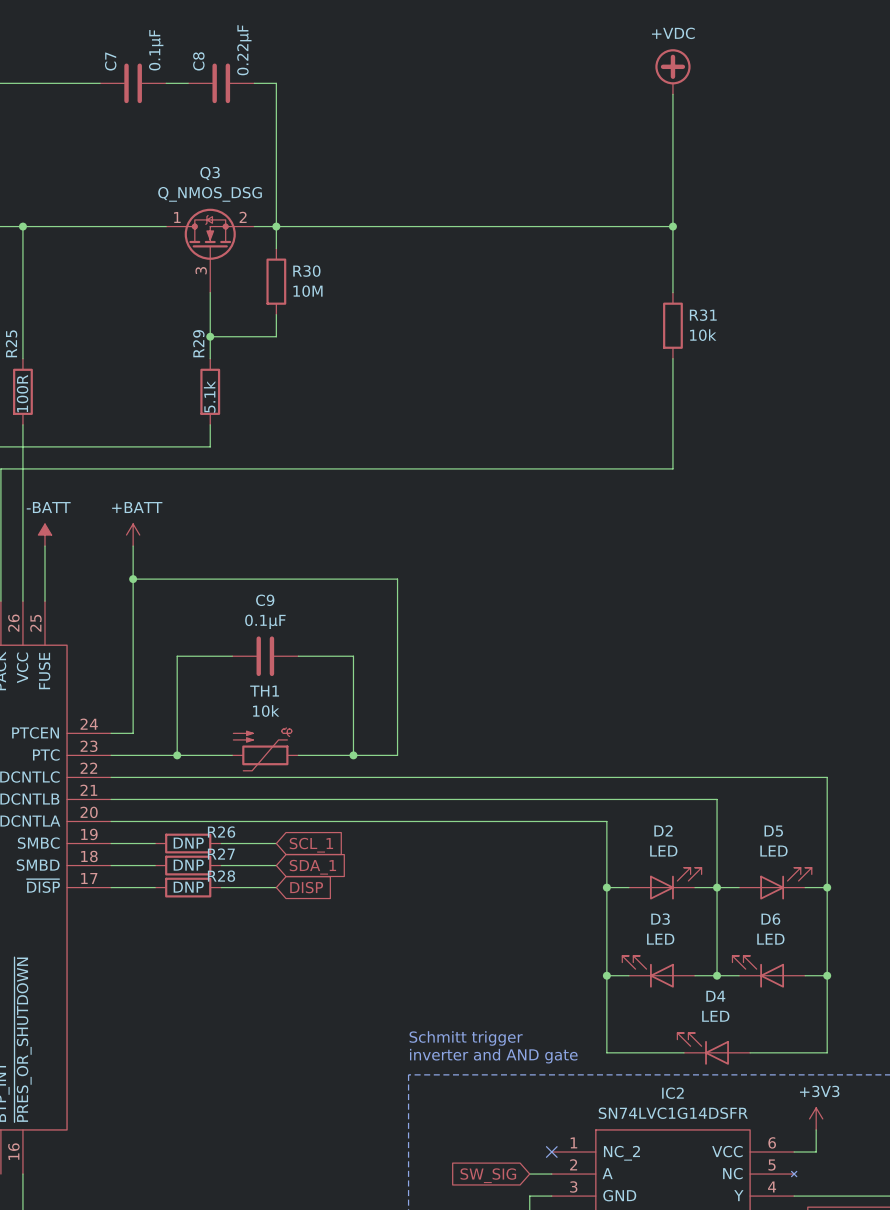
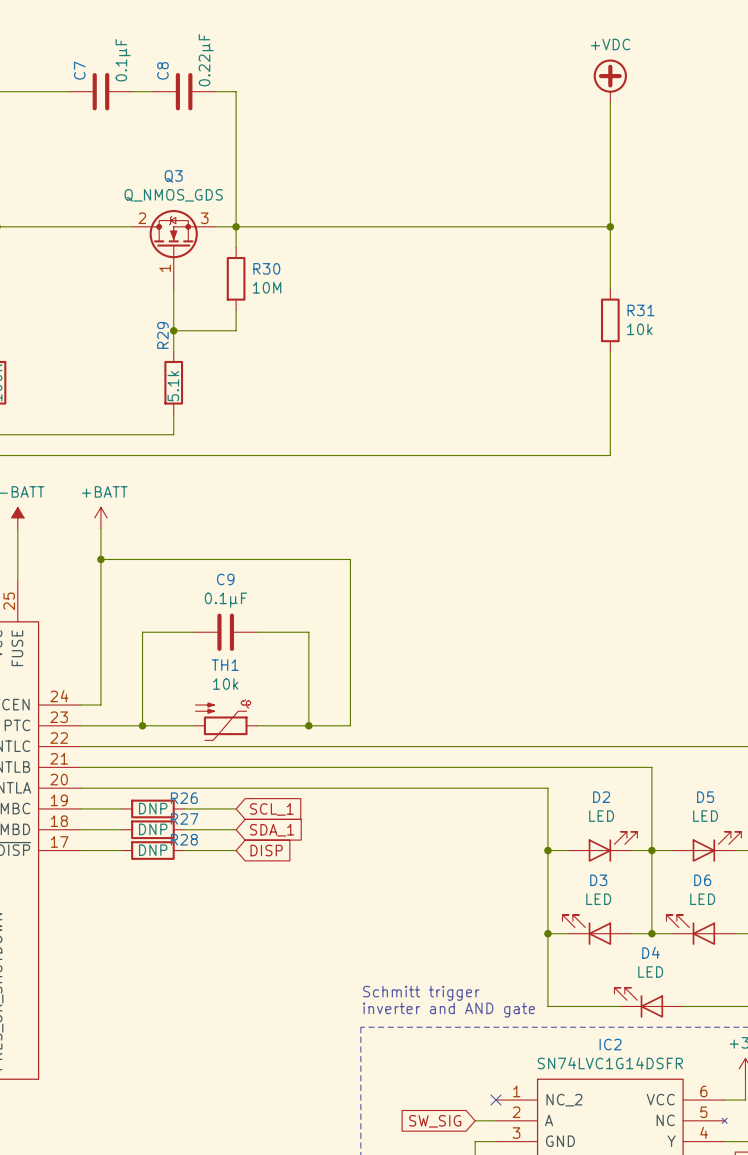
Q3 value: Q_NMOS_DSG (210, 194) -> Q_NMOS_GDS (173, 195)
Q3 pin number: 1 (177, 217) -> 2 (142, 218)
Q3 pin number: 2 (243, 217) -> 3 (204, 218)
Q3 pin number: 3 (201, 270) -> 1 (165, 268)

